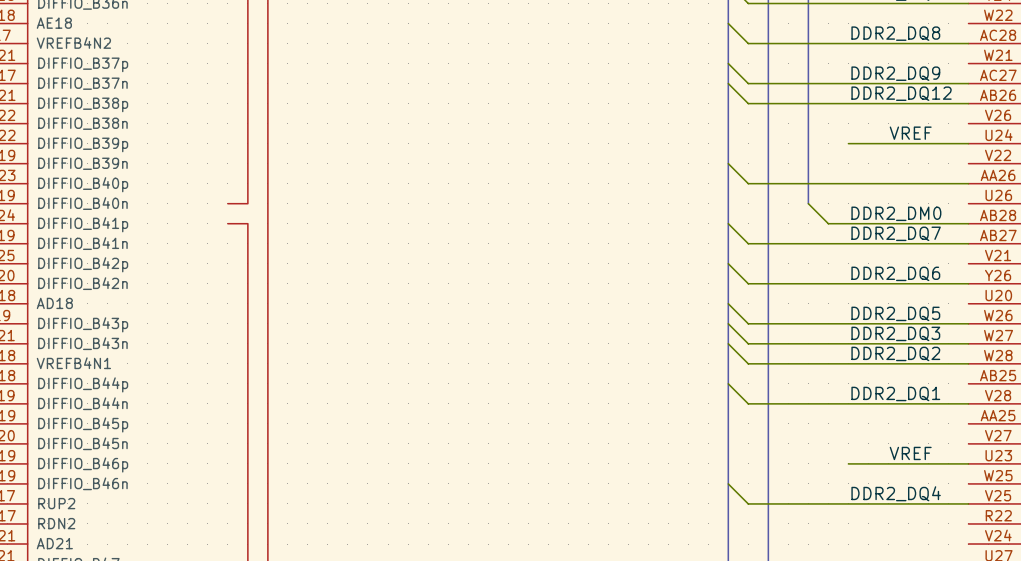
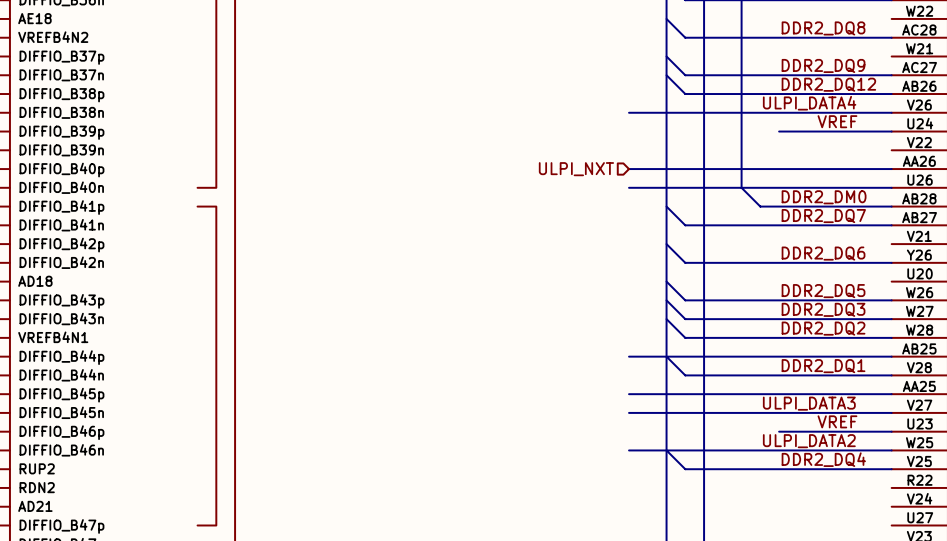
label: none -> ULPI_DATA4 (809, 103)
wire: none -> (629, 112) (891, 112)
wire: (728, 163) (748, 183) -> (629, 169) (685, 169)
hierarchical label: none -> ULPI_NXT (576, 169)
wire: none -> (629, 187) (891, 187)
wire: none -> (629, 356) (891, 356)
wire: none -> (629, 394) (891, 394)
label: none -> ULPI_DATA3 (809, 403)
wire: none -> (629, 412) (891, 412)
label: none -> ULPI_DATA2 (809, 441)
wire: none -> (629, 450) (891, 450)

